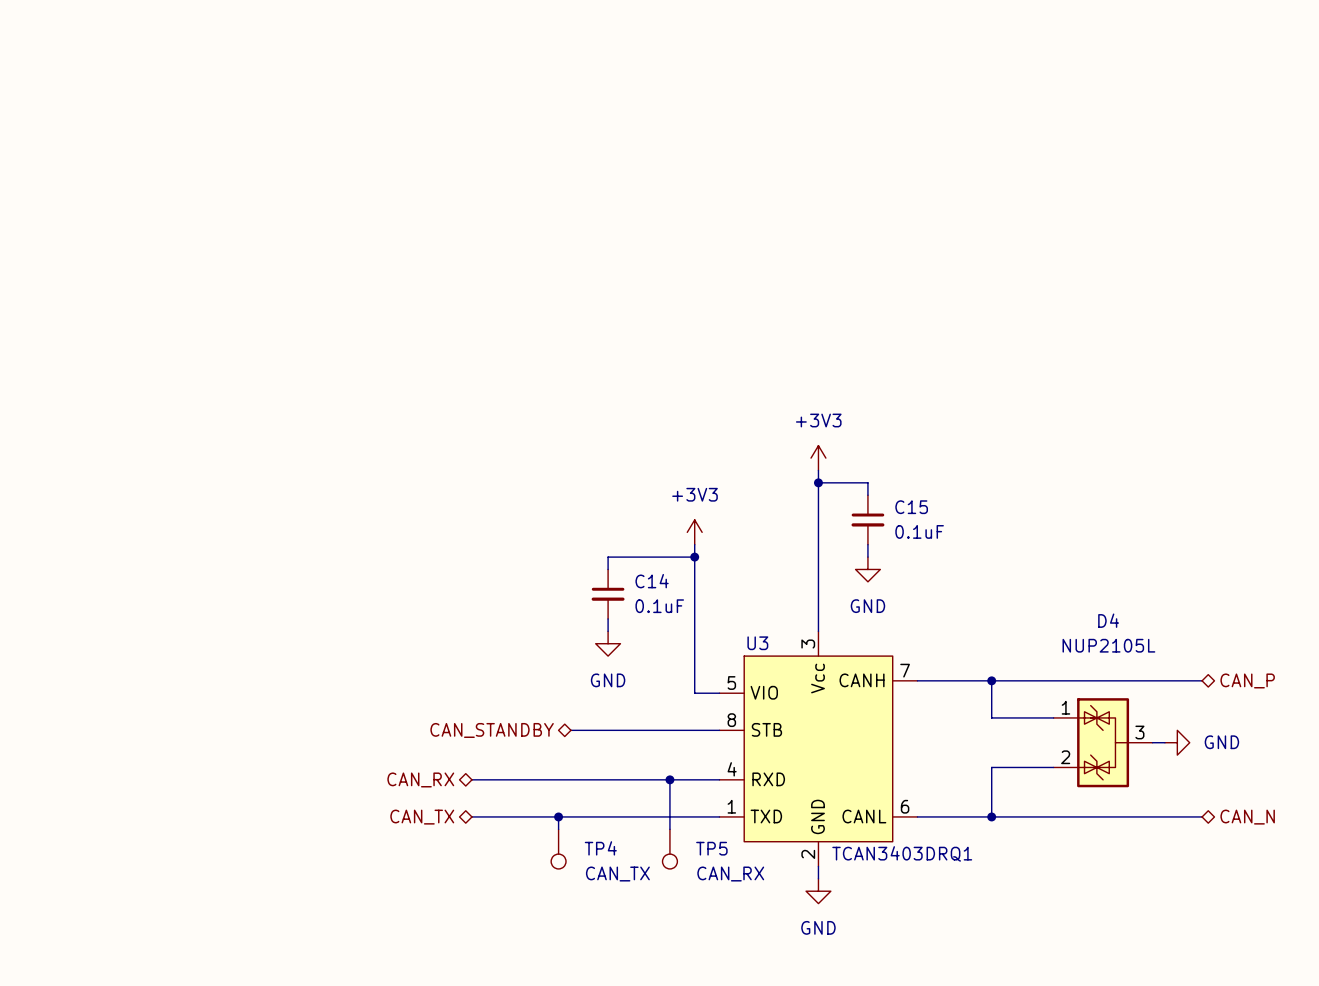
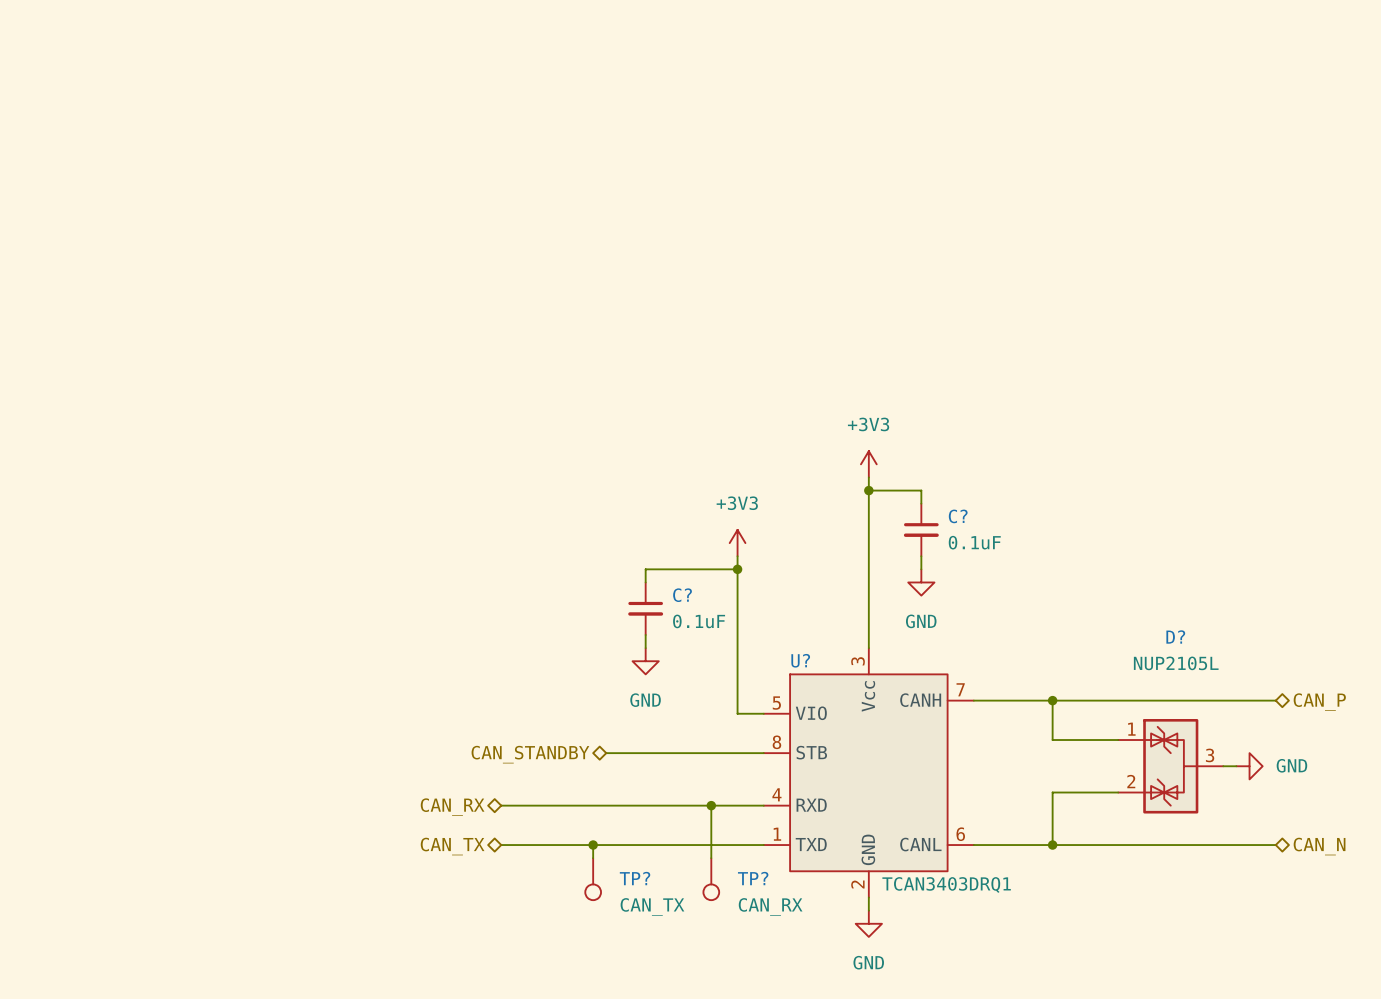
C15 name: C15 (911, 507) -> C? (958, 516)
C14 name: C14 (652, 581) -> C? (682, 595)
D4 name: D4 (1108, 620) -> D? (1175, 637)
U3 name: U3 (757, 643) -> U? (800, 660)
TP4 name: TP4 (600, 848) -> TP? (635, 878)
TP5 name: TP5 (711, 848) -> TP? (753, 878)

